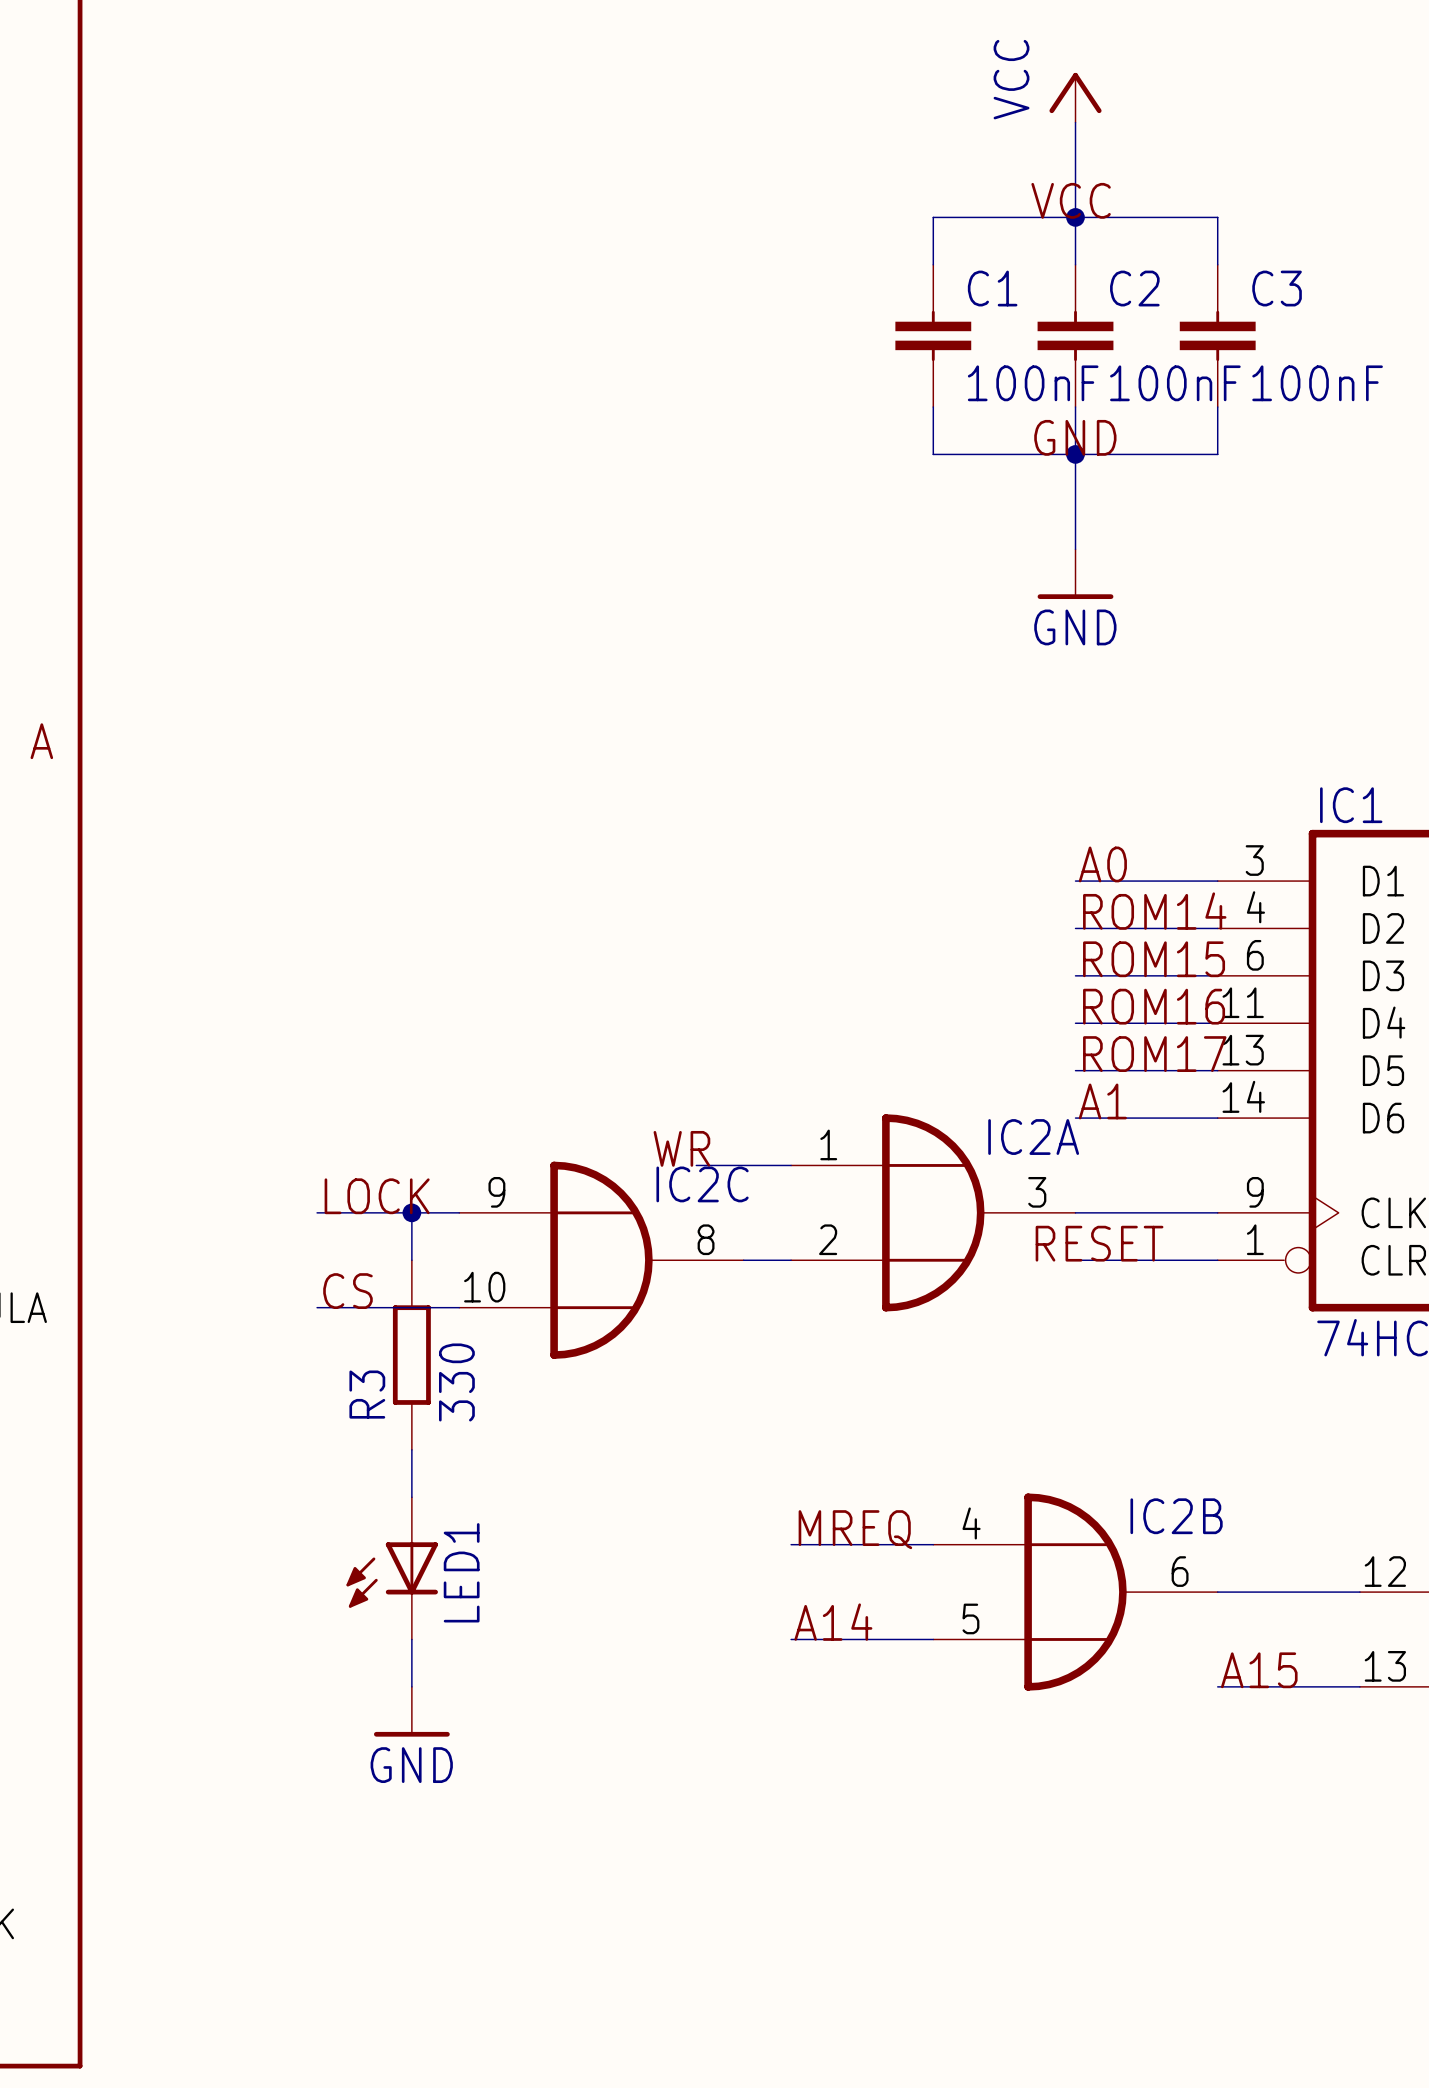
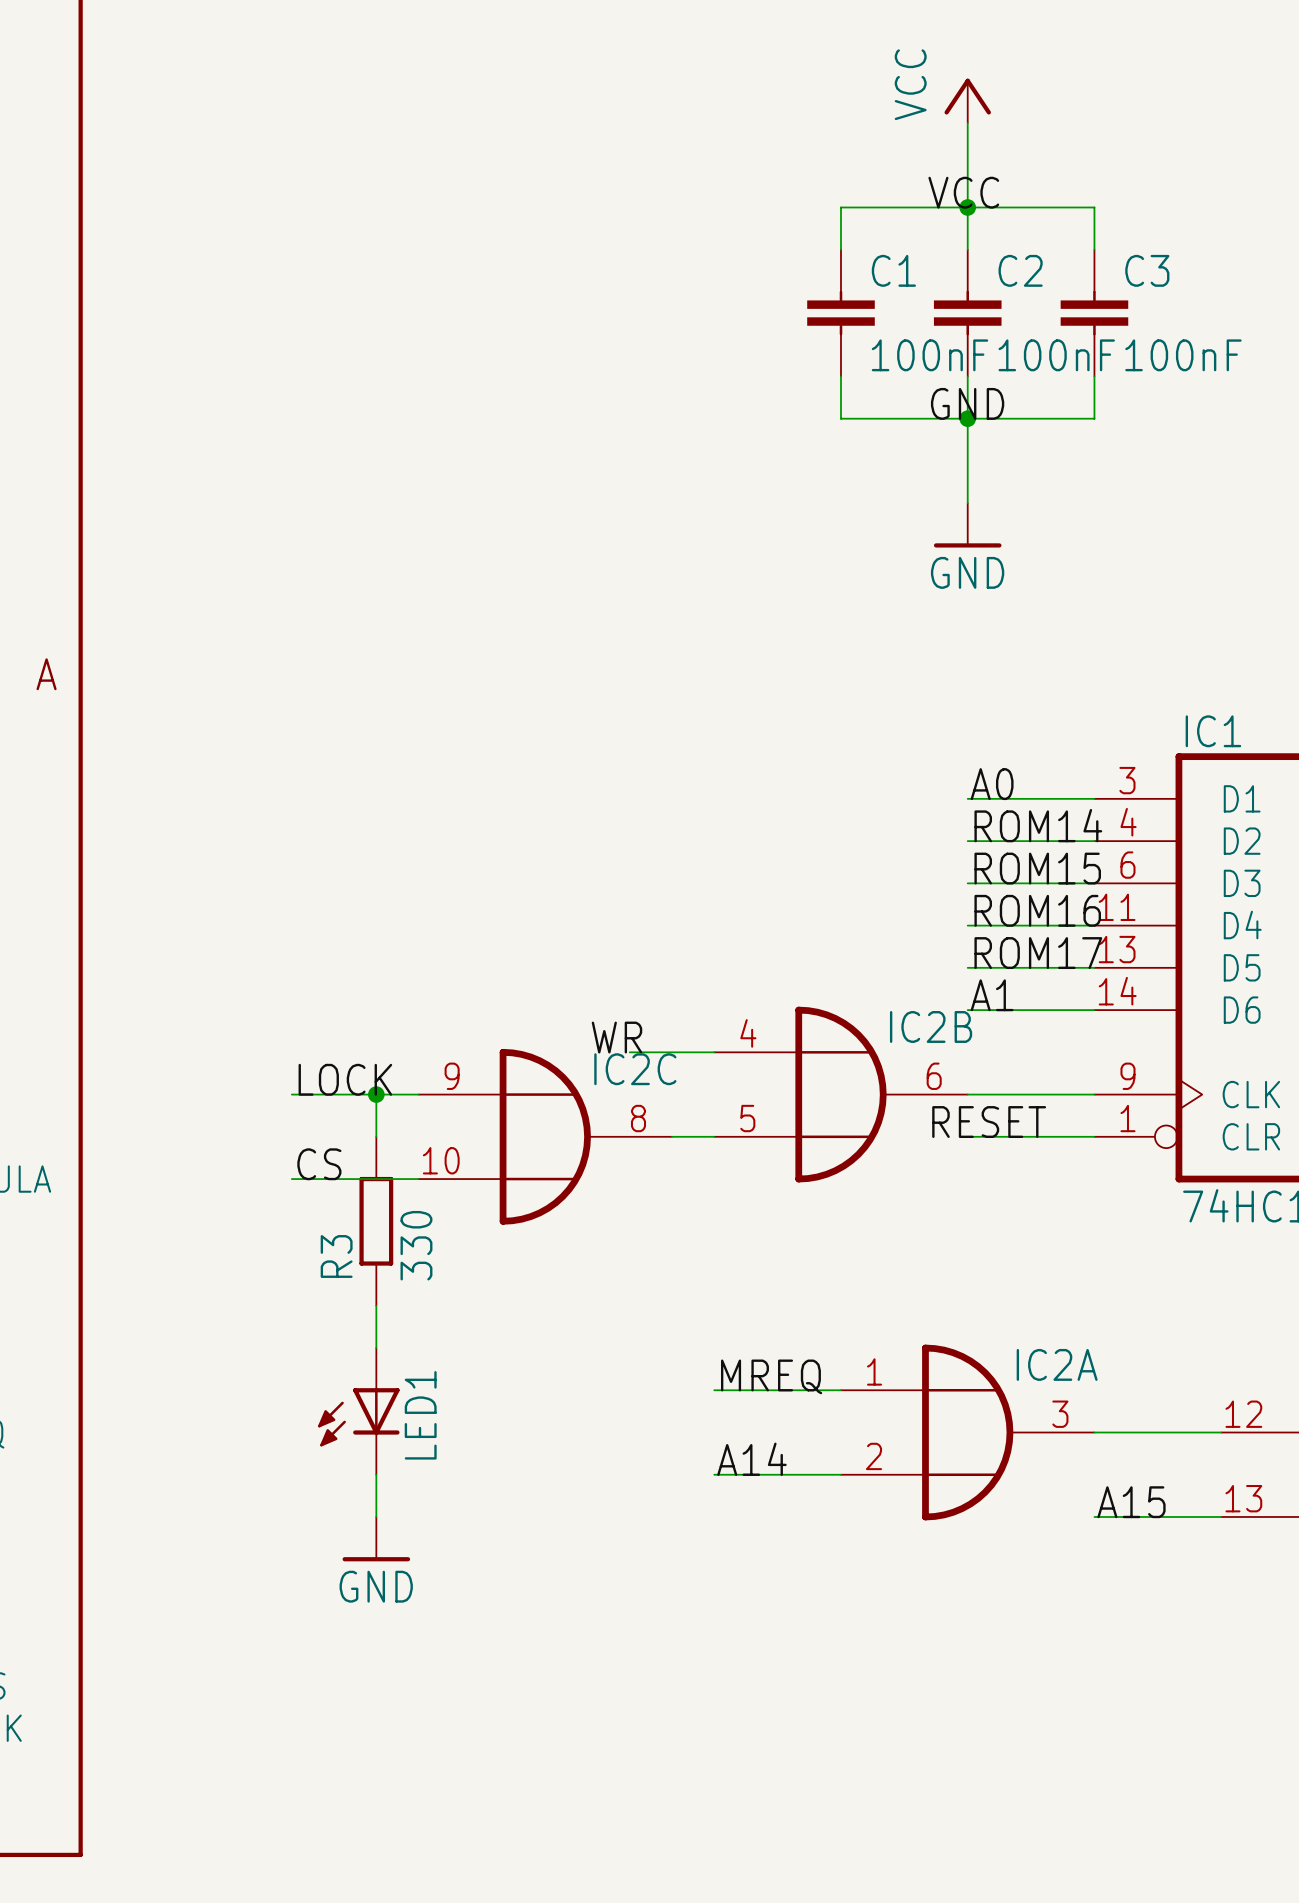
IC2A position: (933, 1212) -> (967, 1432)
IC2B position: (1075, 1592) -> (841, 1094)

